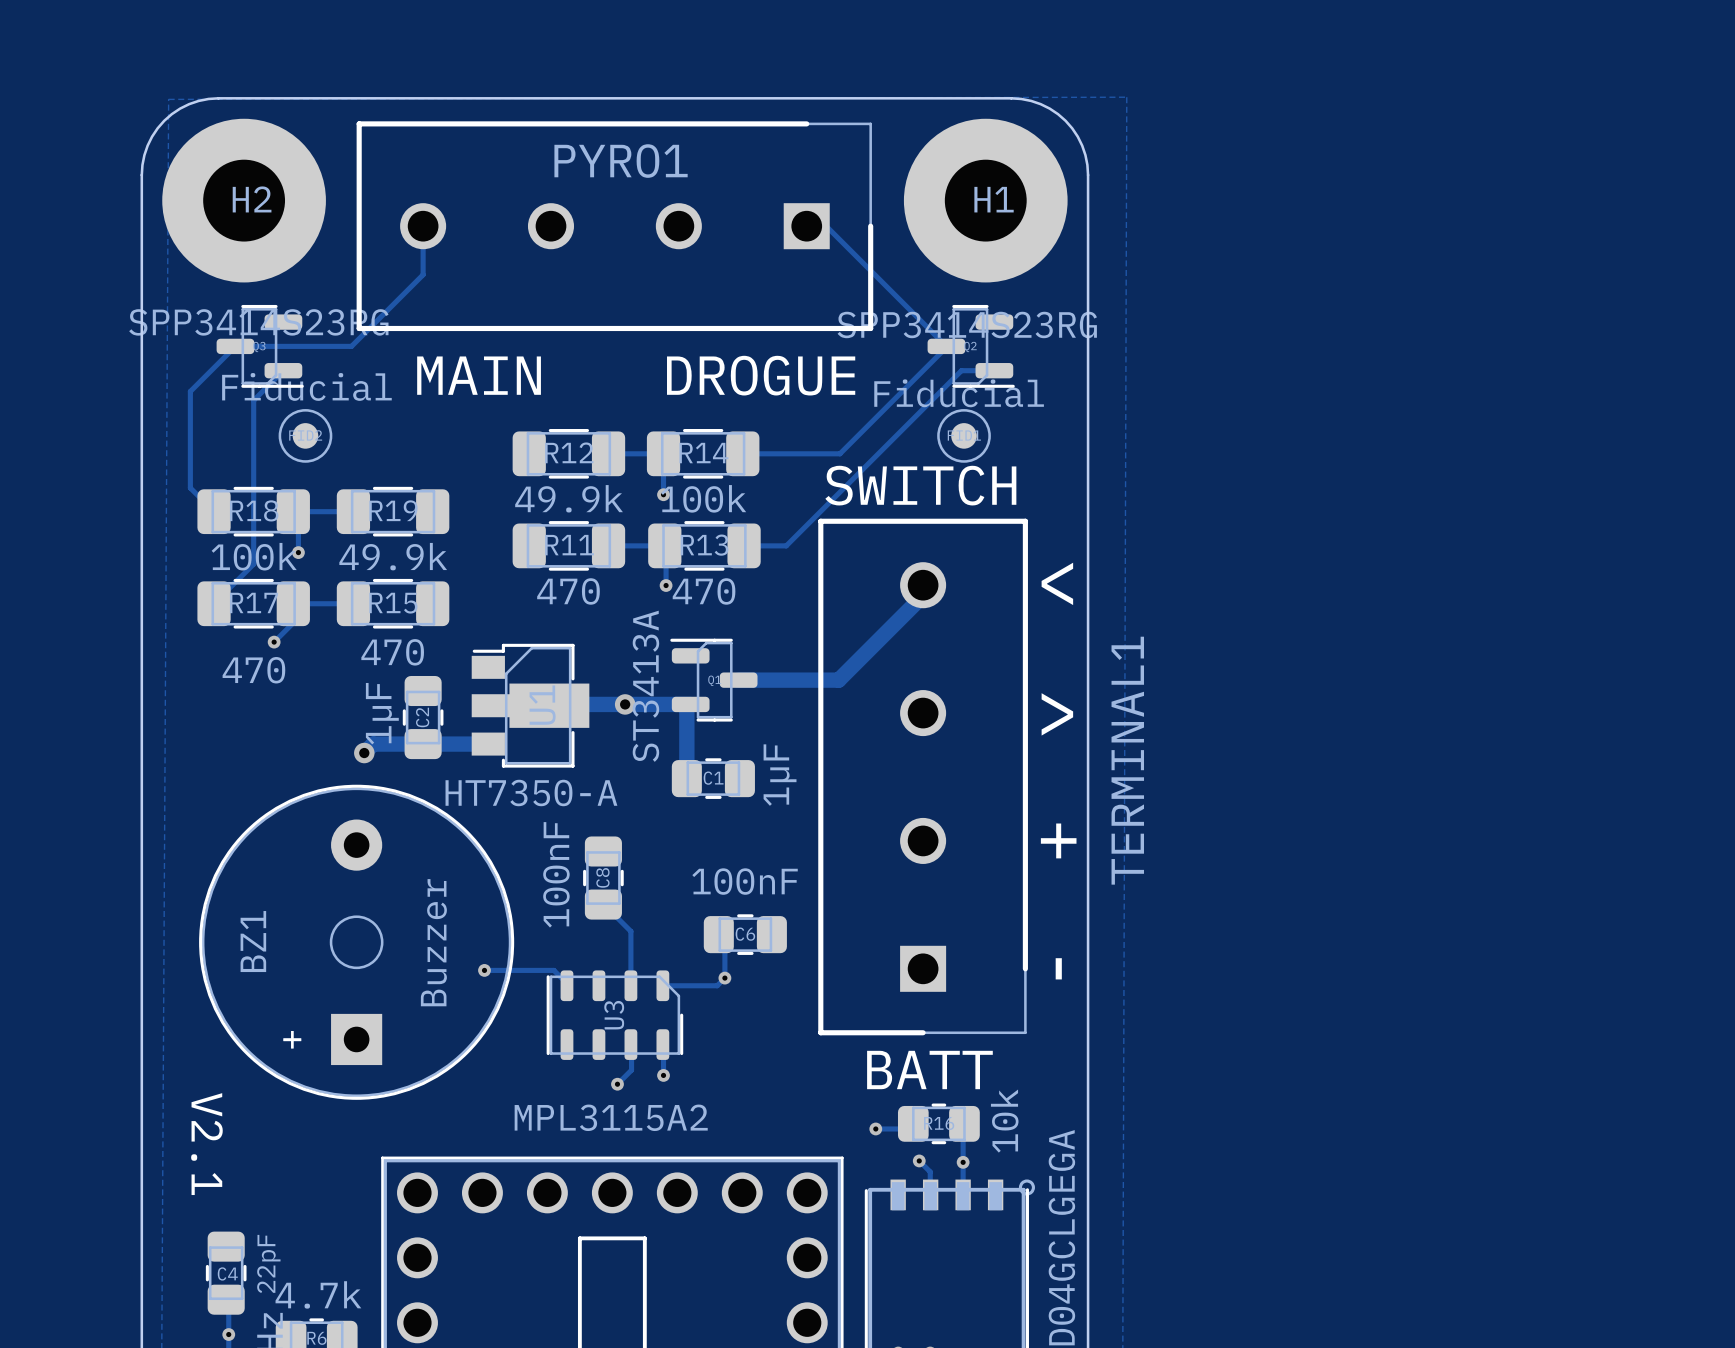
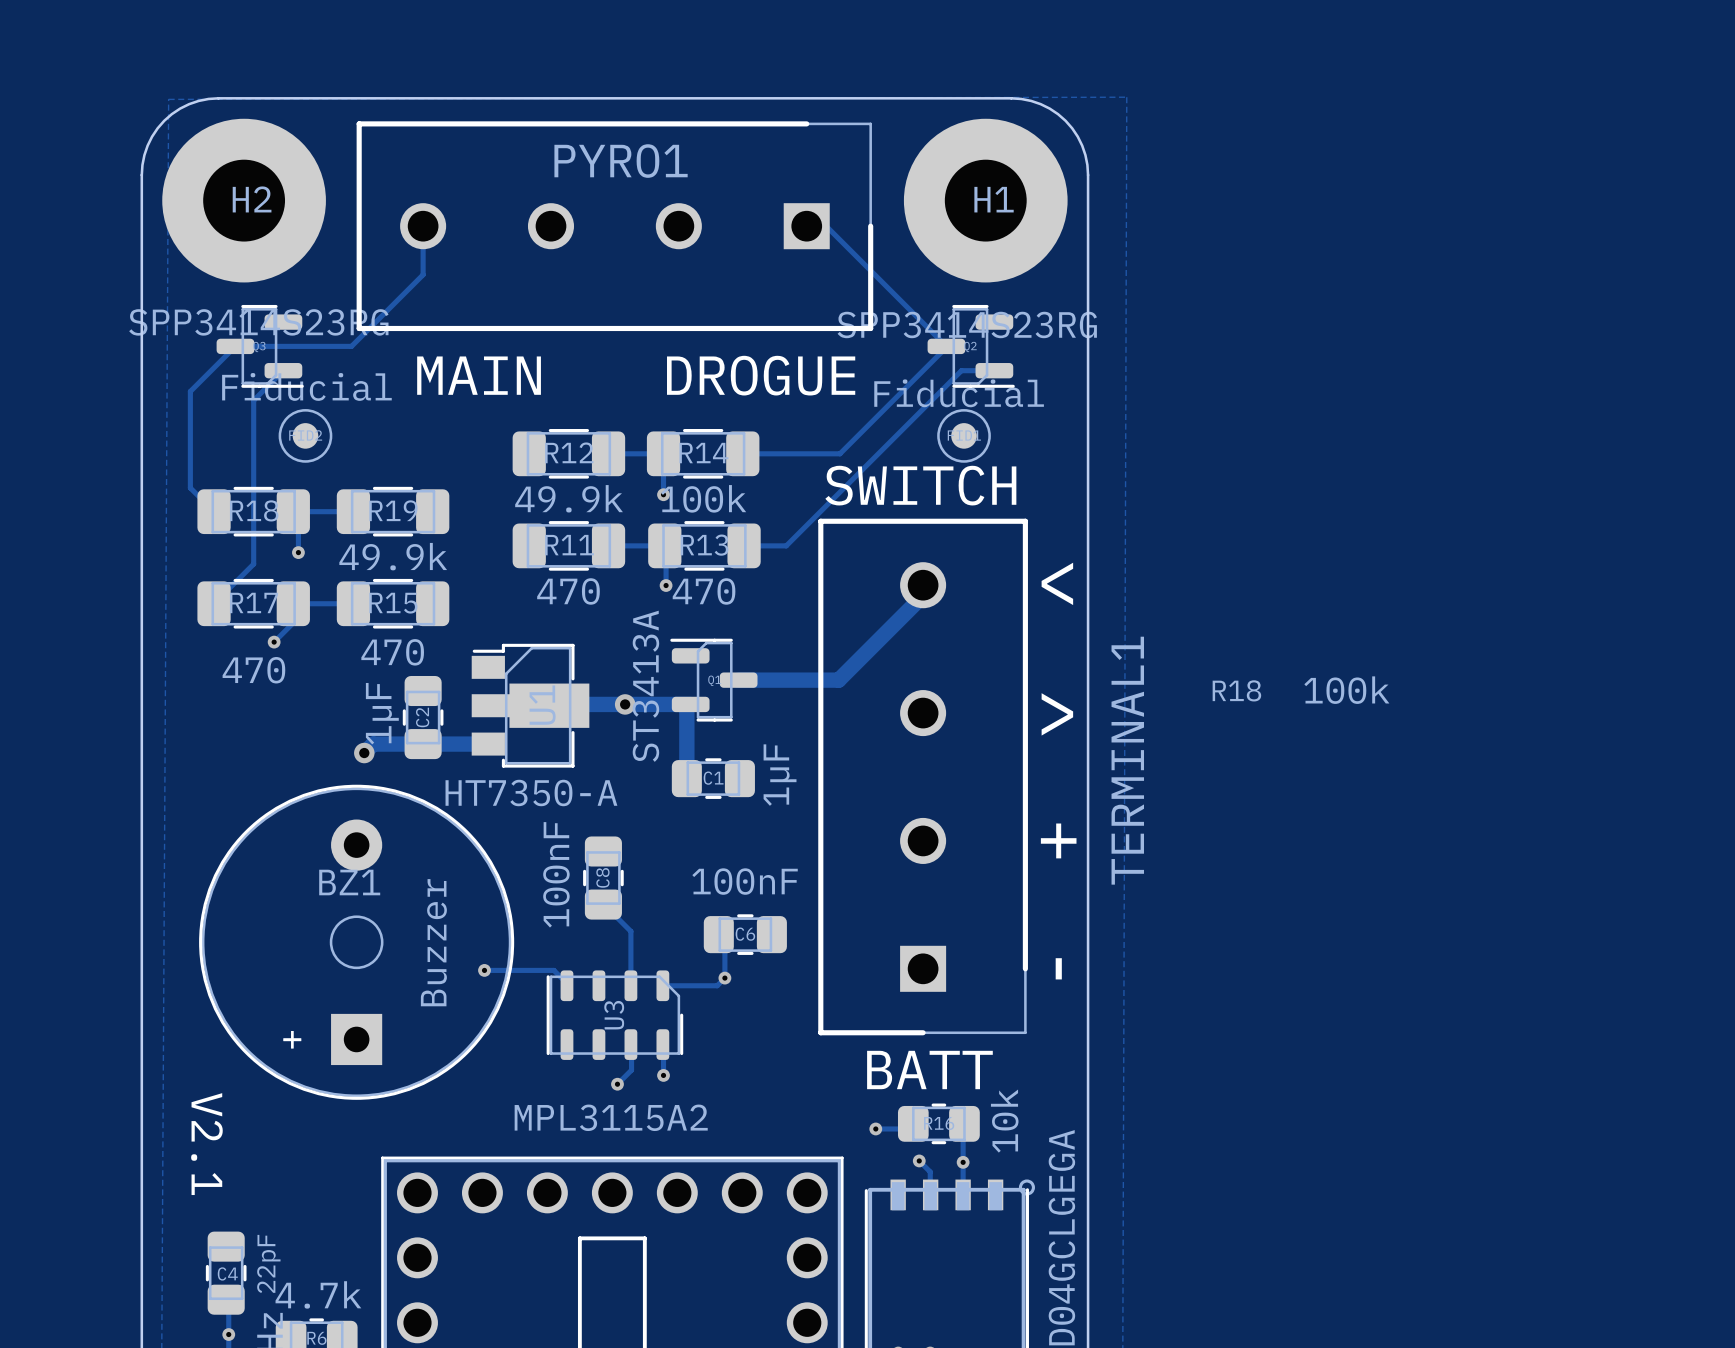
R18 value position: 100k (254, 556) -> 100k (1346, 690)
text: none -> R18 (1236, 690)
BZ1 name rotation: 0° (253, 941) -> 90° clockwise (349, 882)
BZ1 name position: BZ1 (253, 941) -> BZ1 (349, 882)

